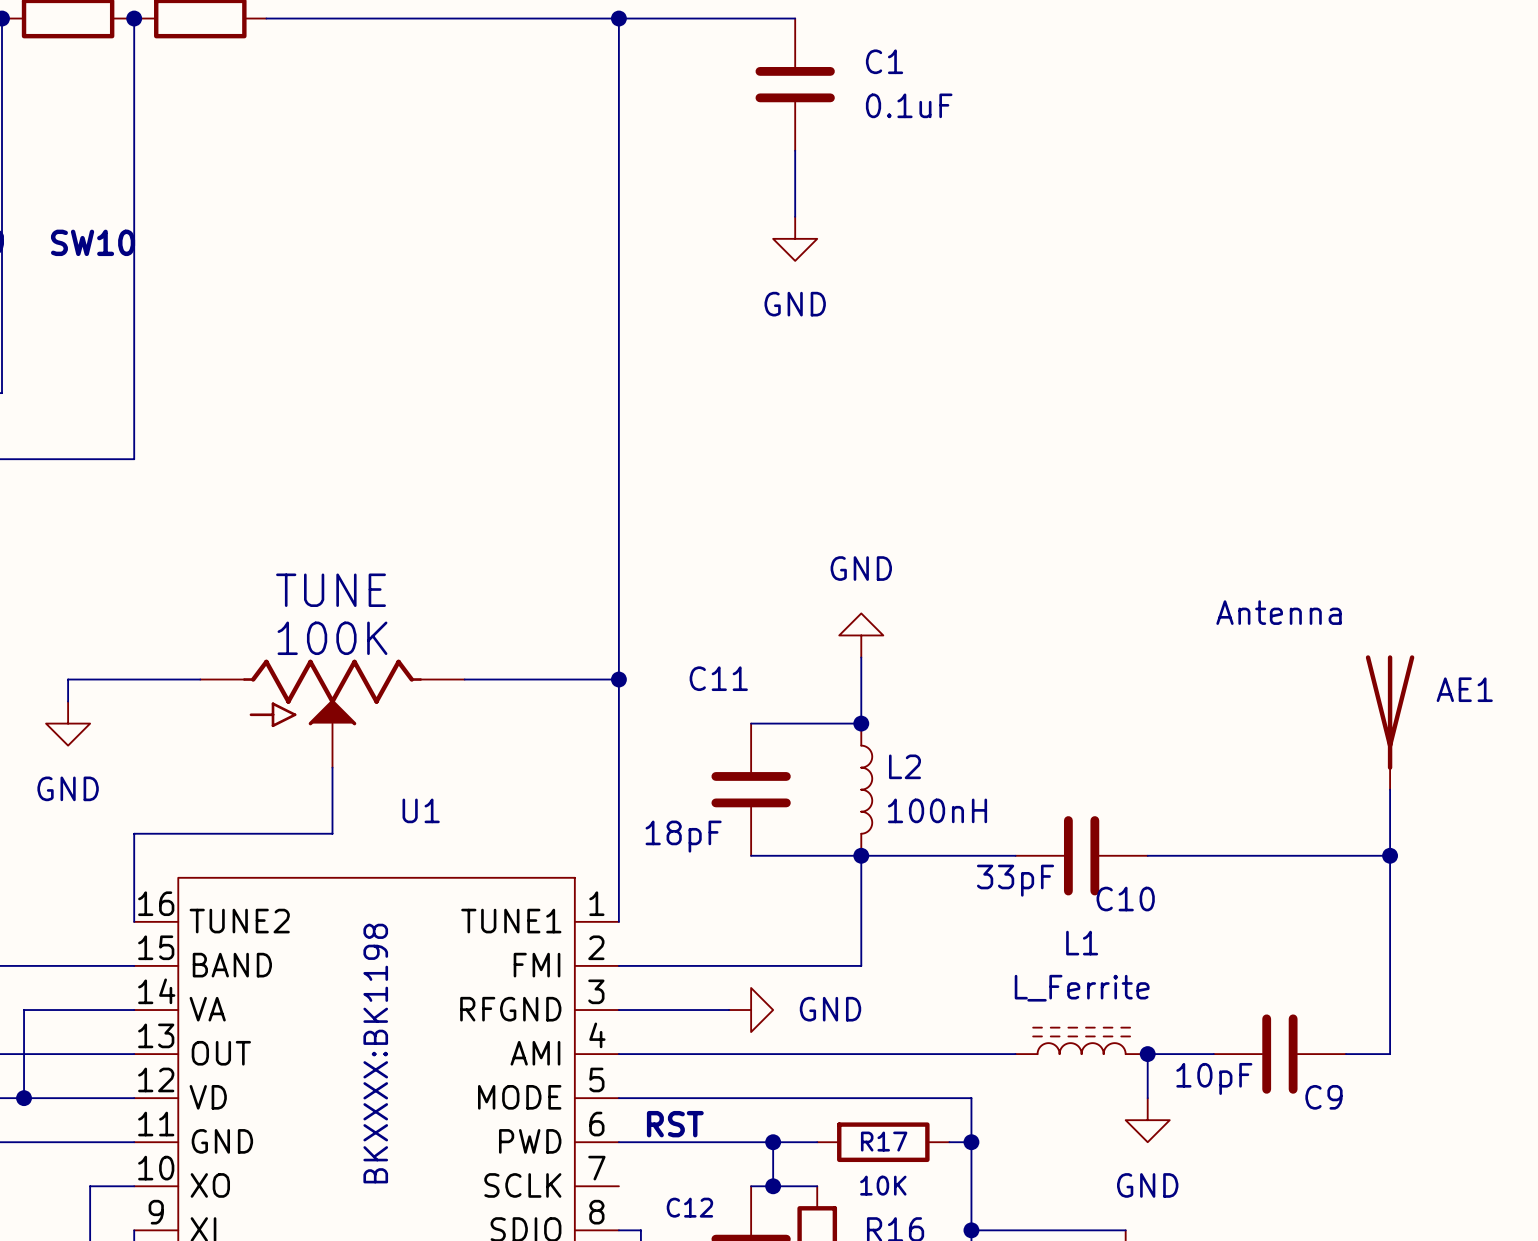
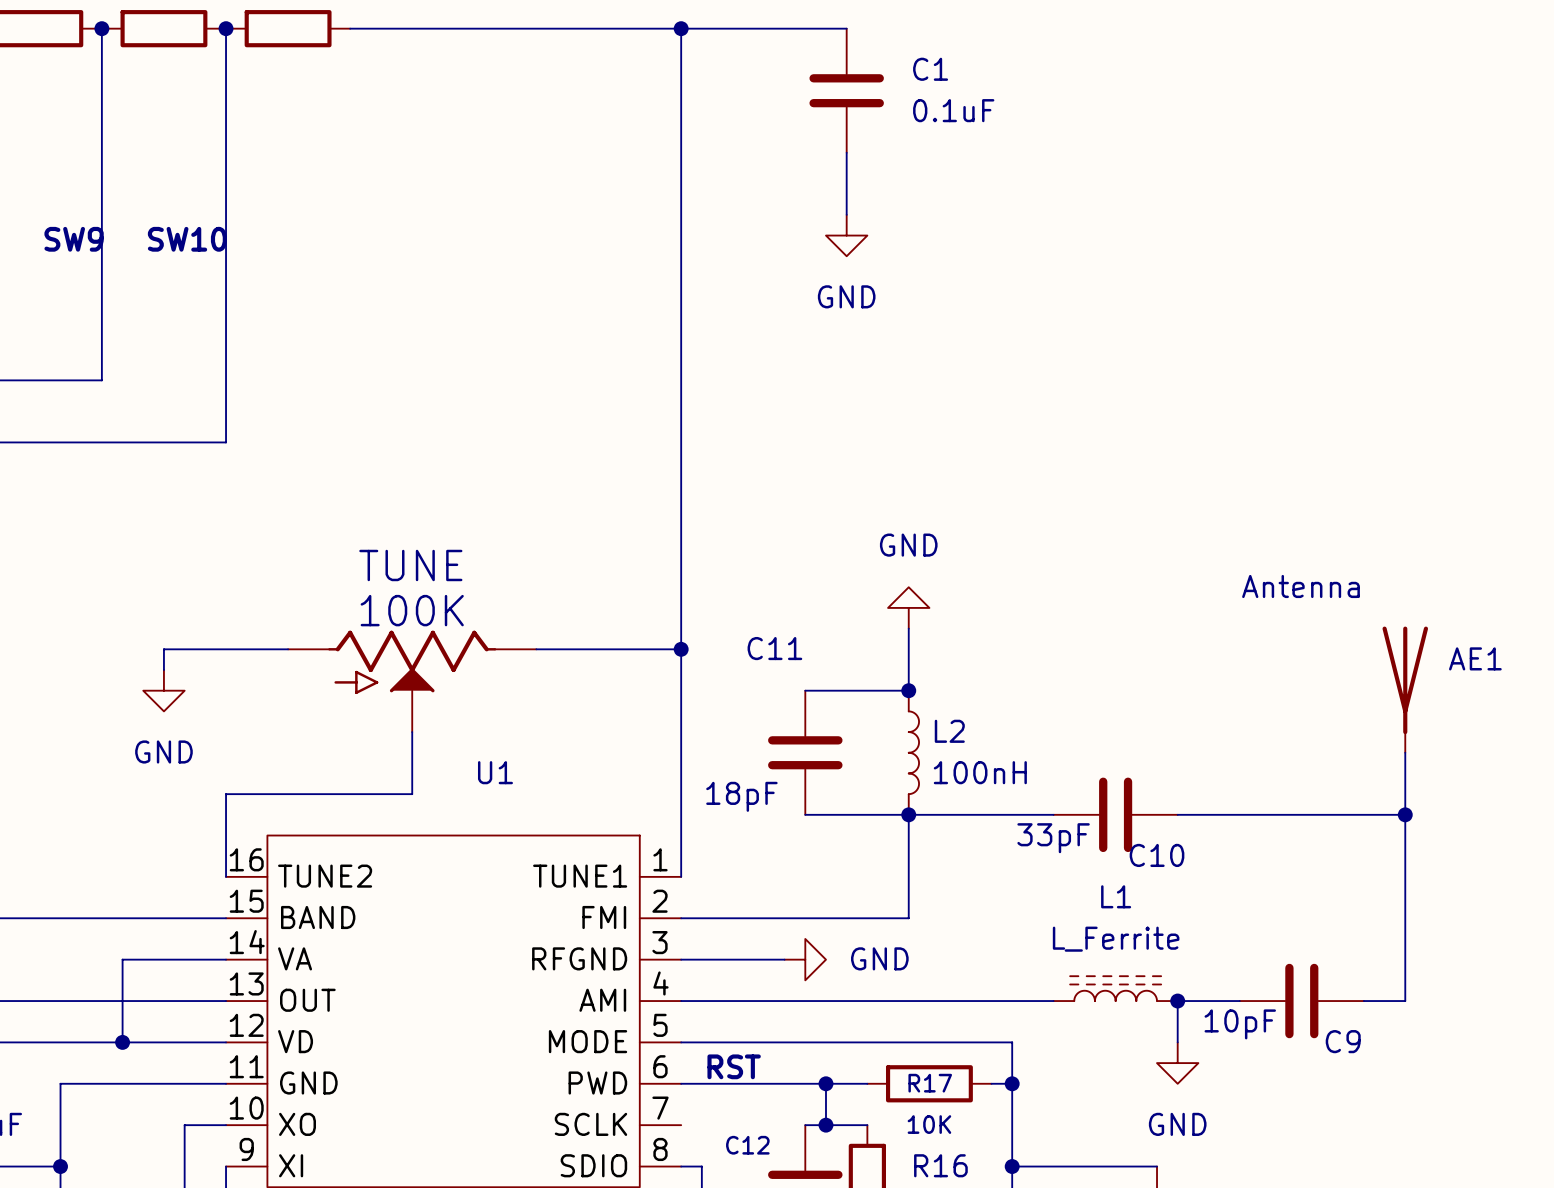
U1 text: BKXXXX:BK1198 (375, 1053) -> none

